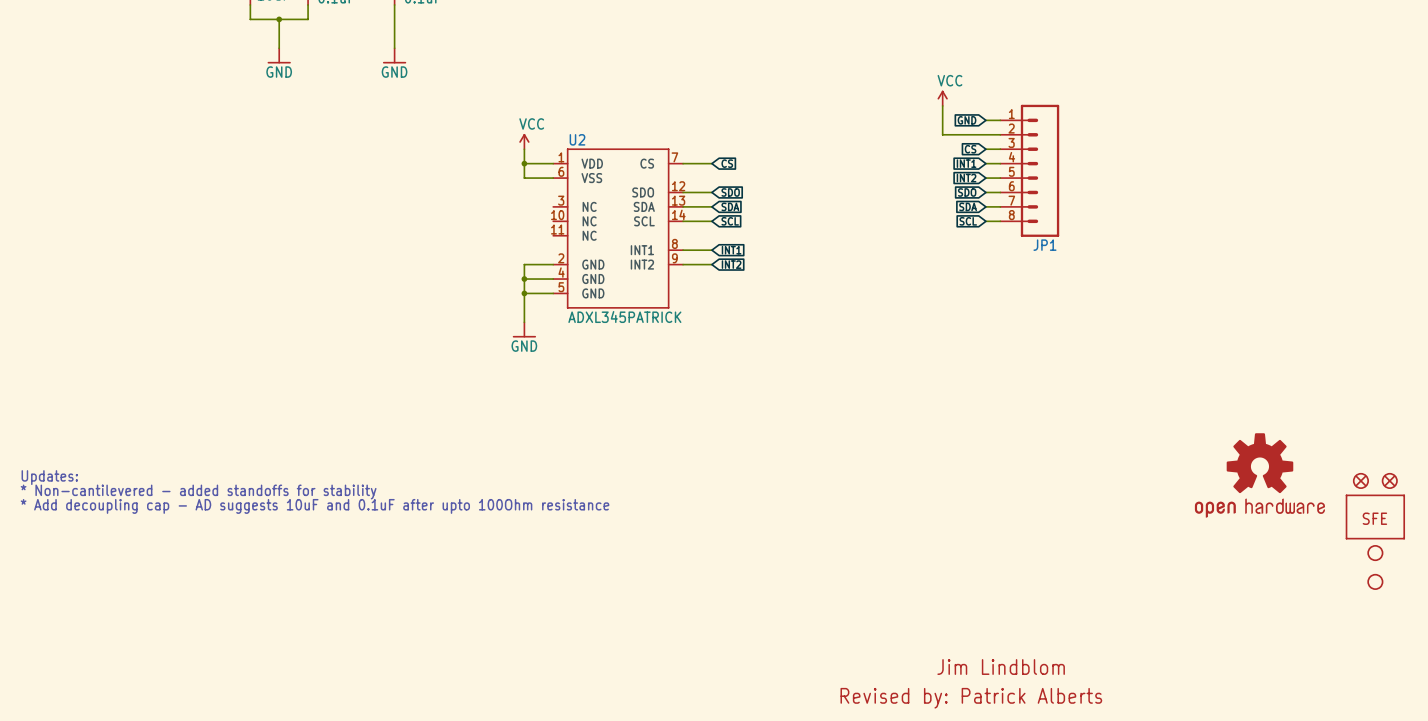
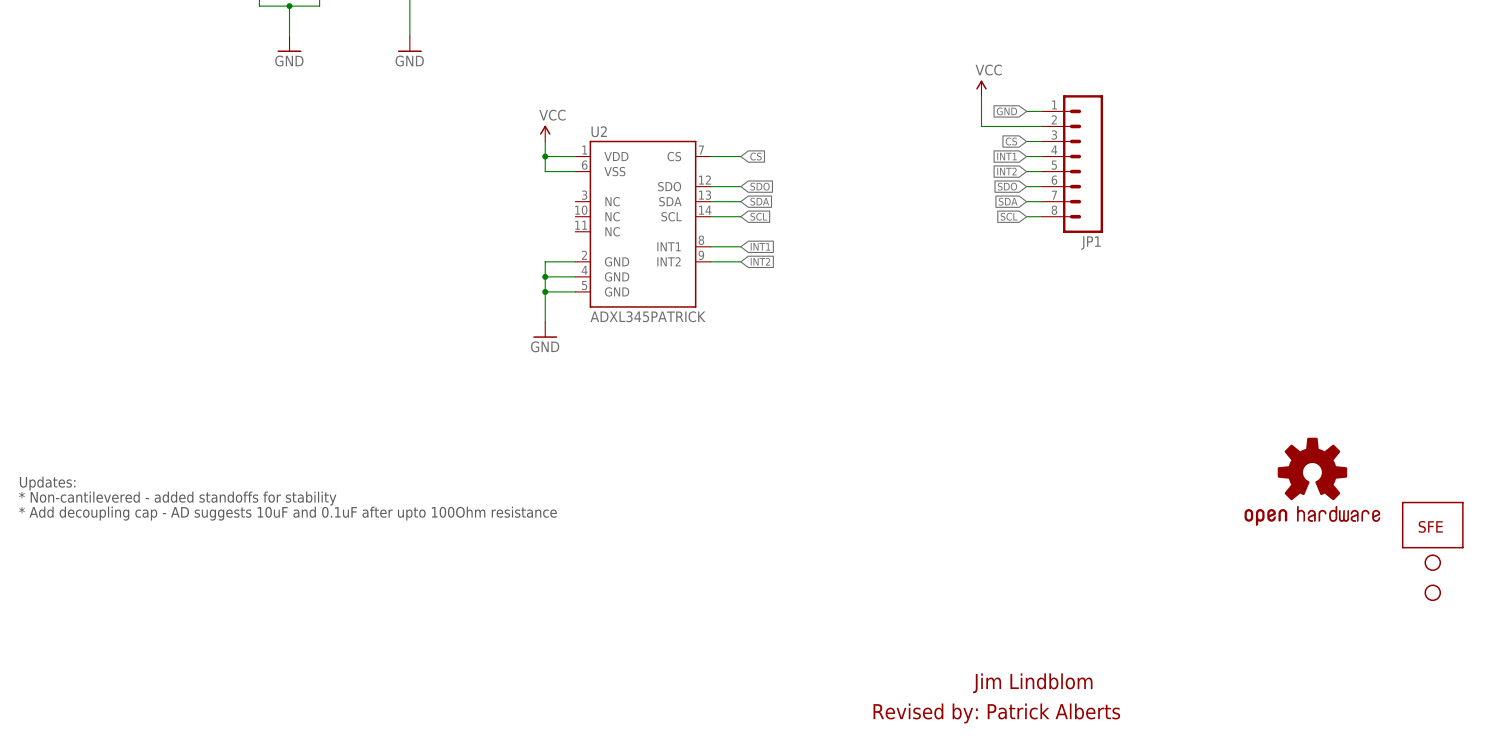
part: (1360, 480) -> none
part: (1389, 480) -> none

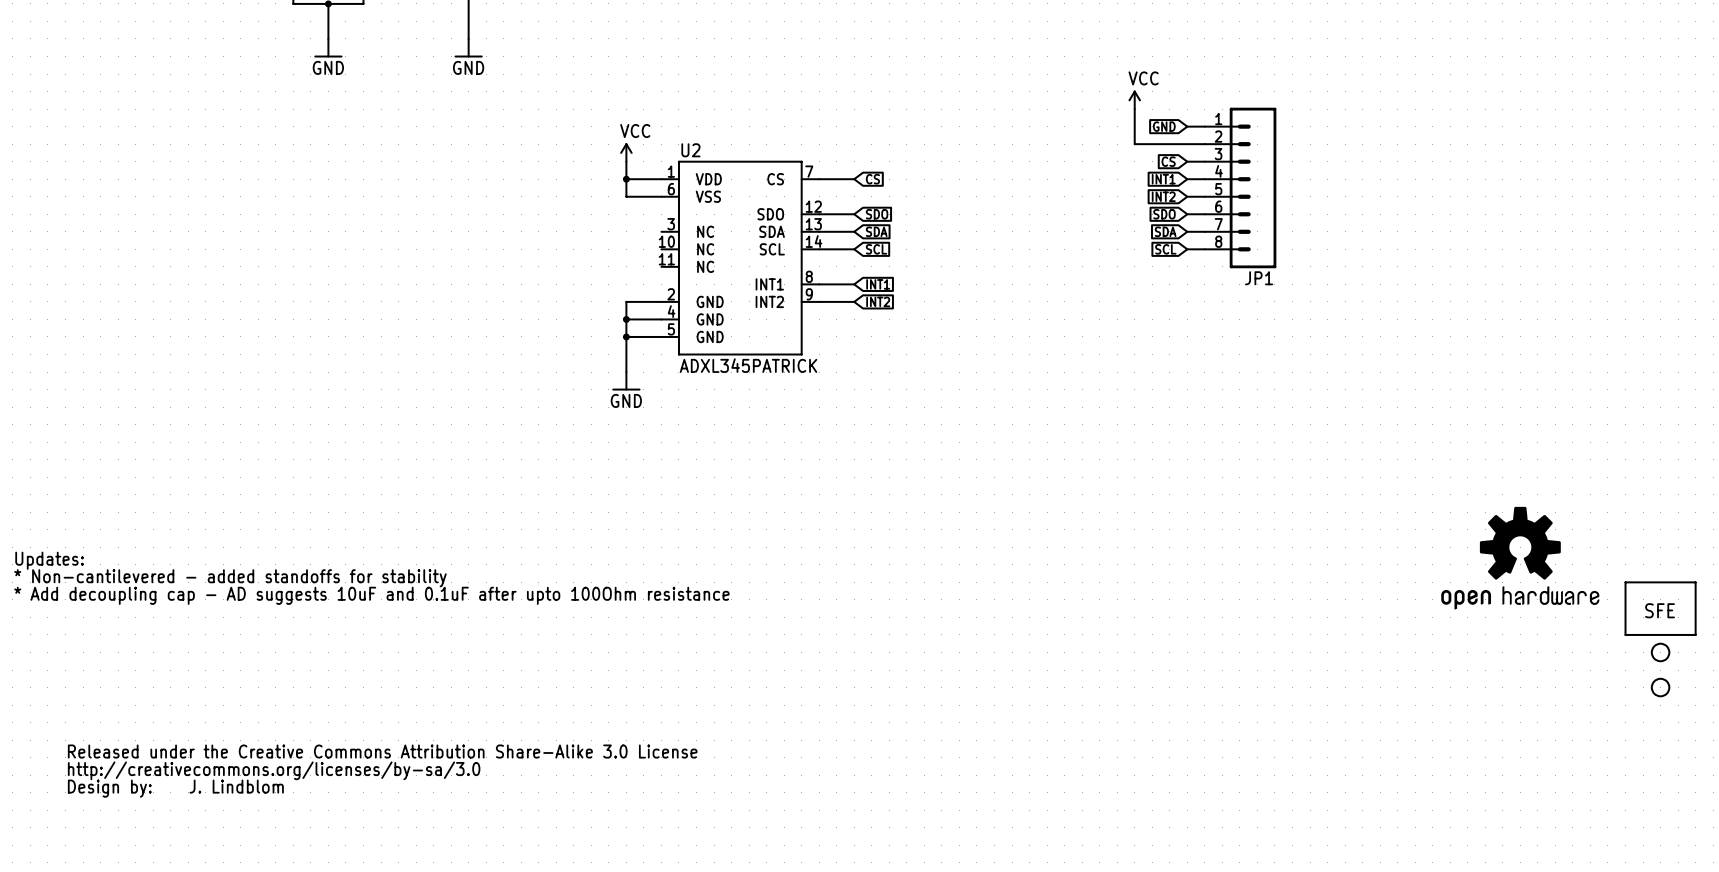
part: none -> (382, 771)
text: none -> J. Lindblom (236, 786)
text: Jim Lindblom (1032, 683) -> none
text: Revised by: Patrick Alberts (996, 713) -> none

